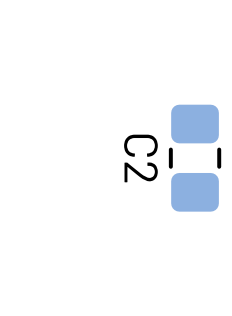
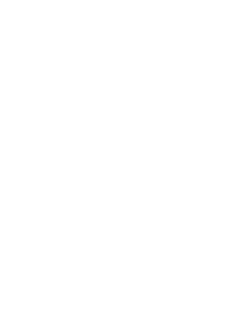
C2: (195, 158) -> none

